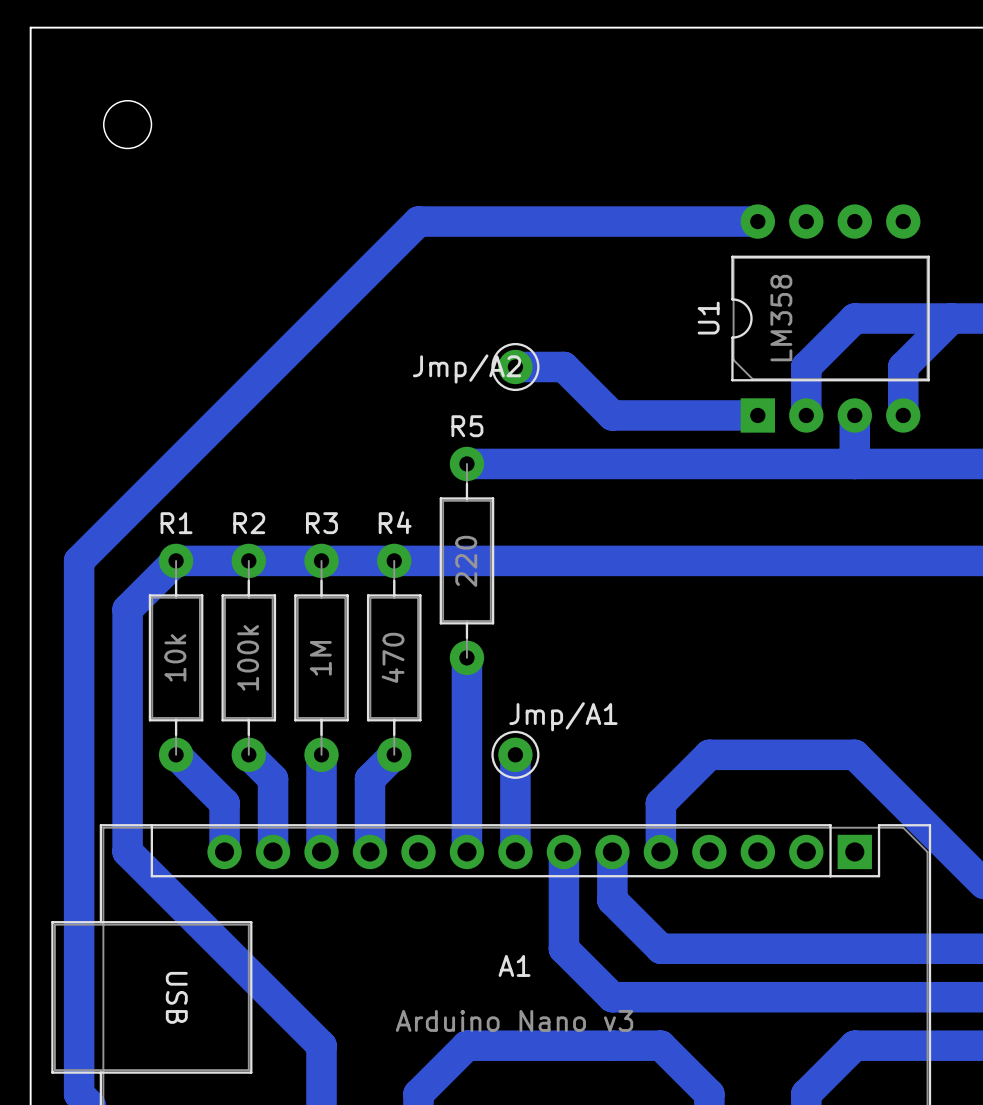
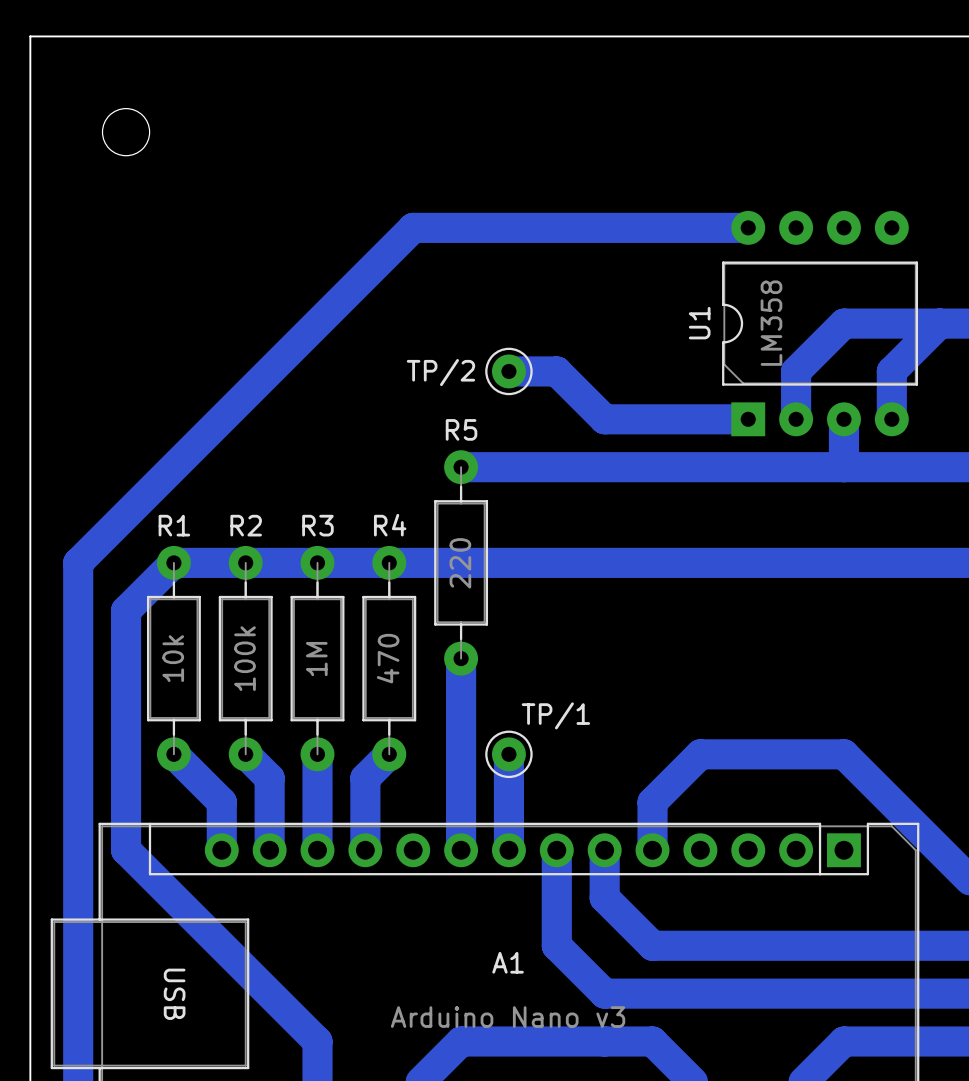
Jmp/A2 name: Jmp/A2 (467, 369) -> TP/2 (440, 372)
Jmp/A1 name: Jmp/A1 (563, 716) -> TP/1 (555, 715)

